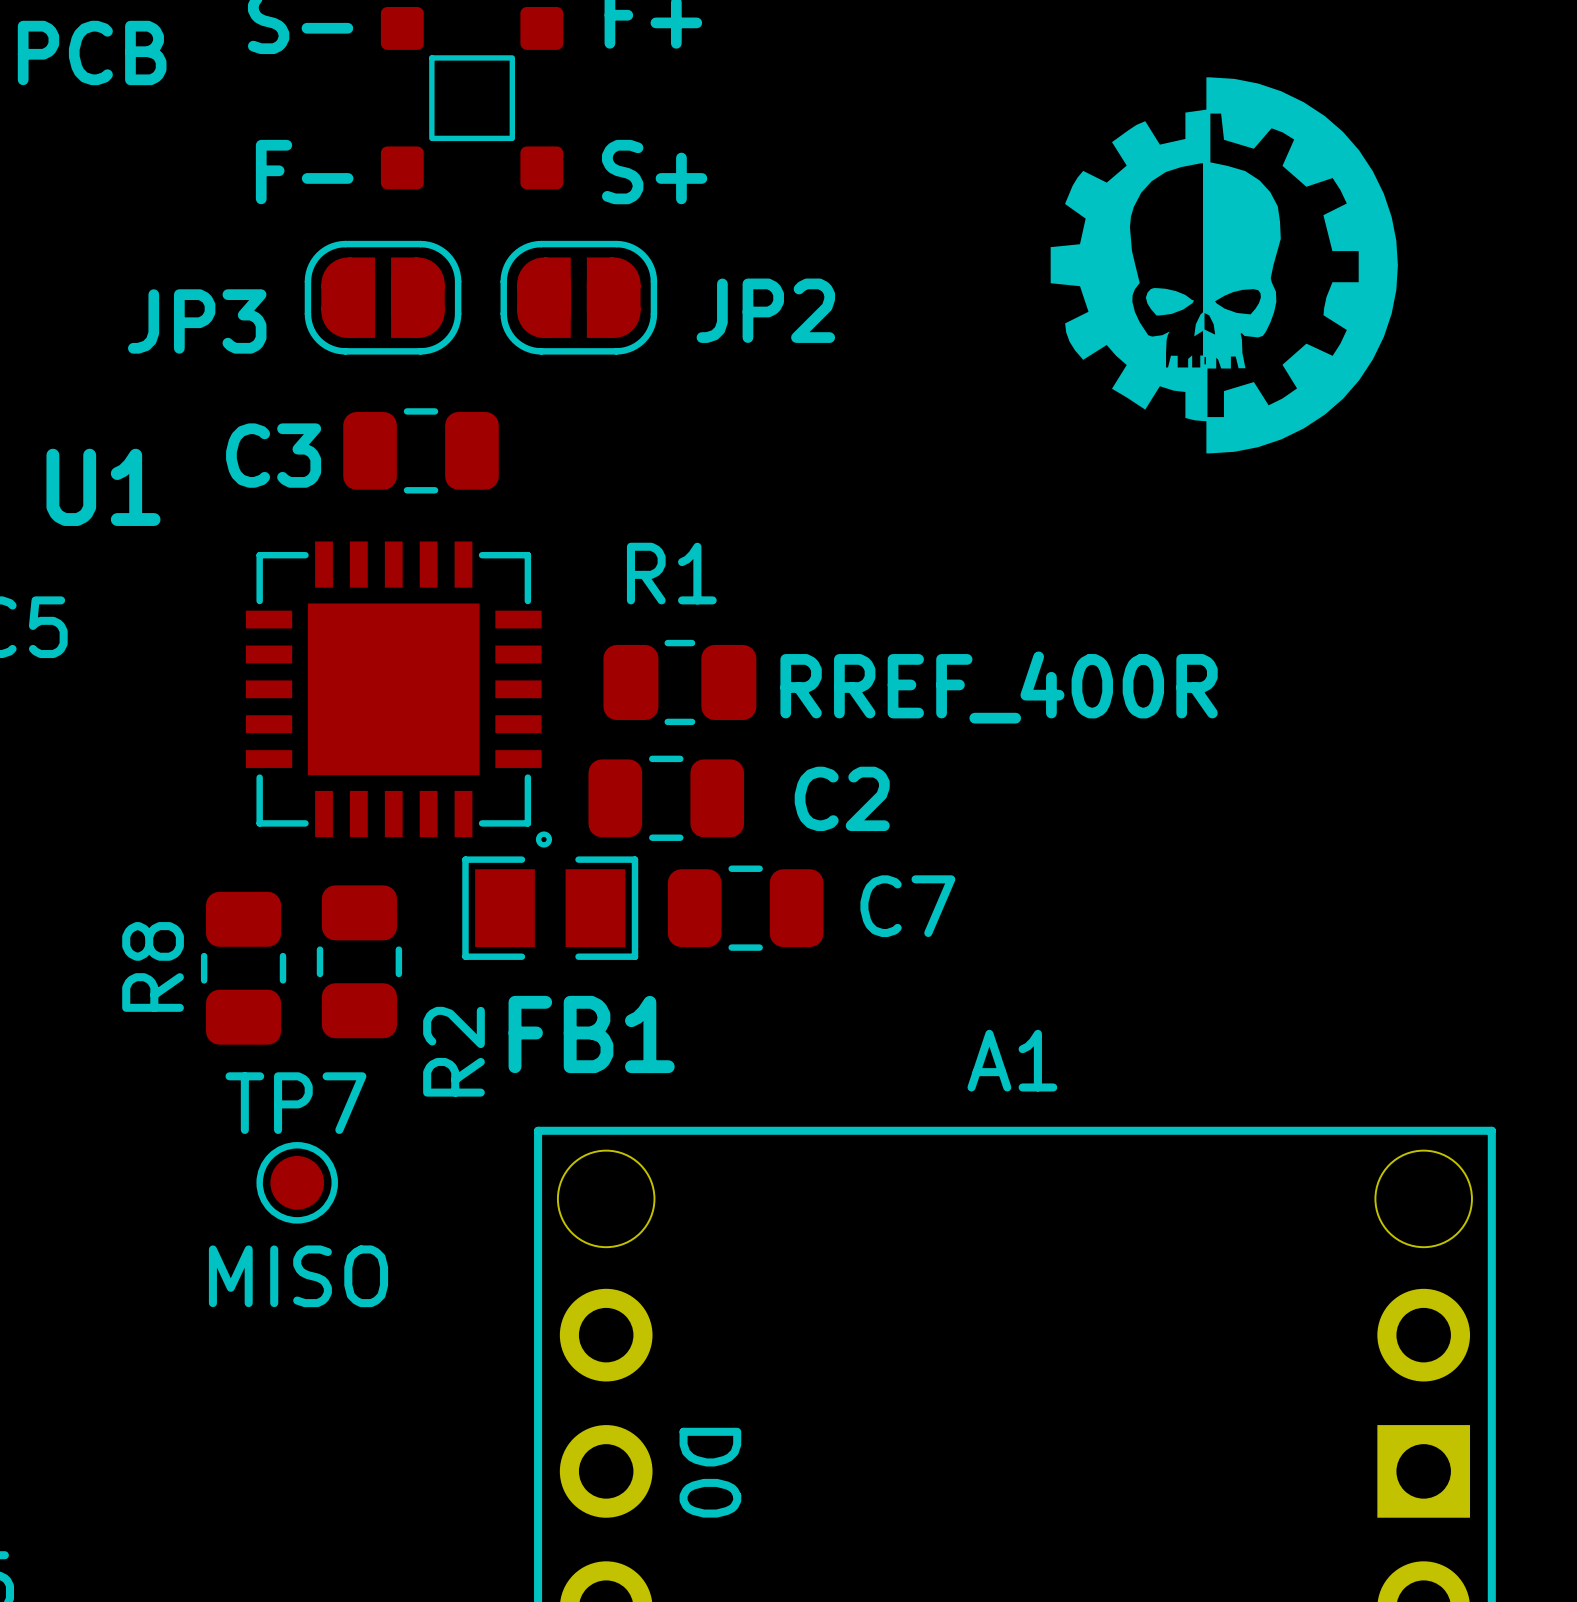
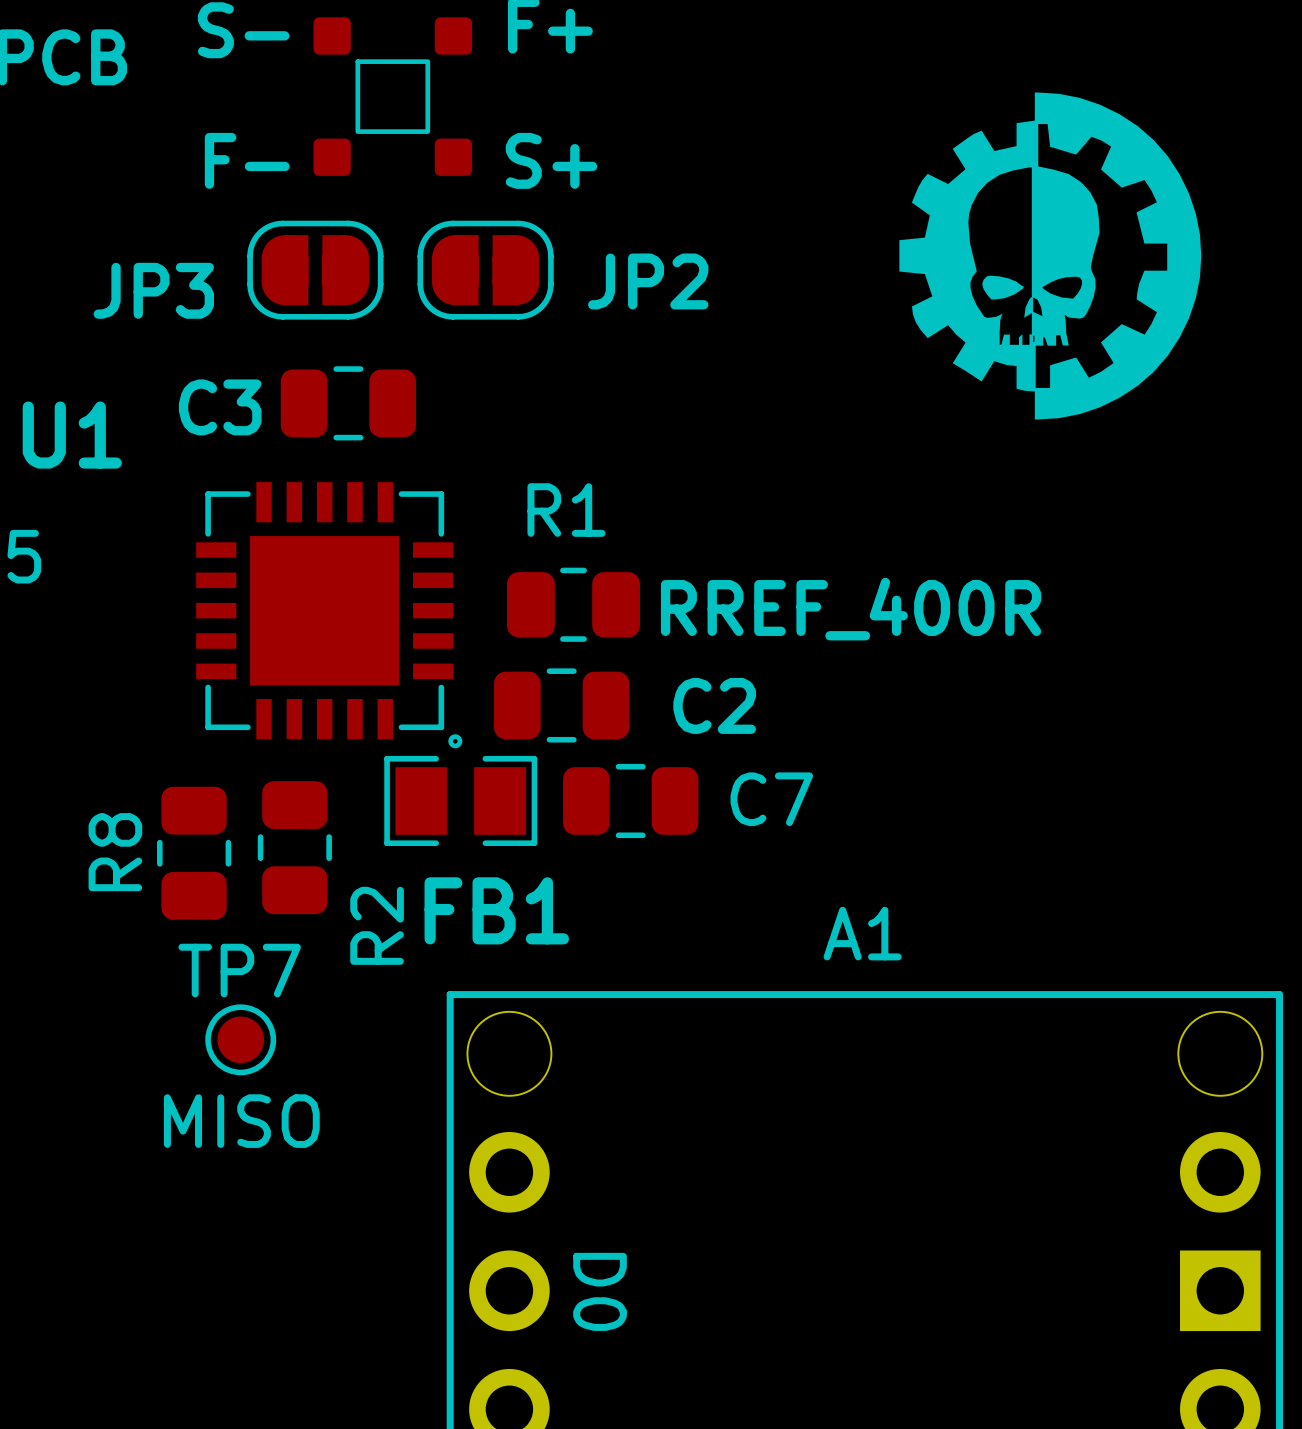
drawing position: (1224, 265) -> (1050, 255)
drawing position: (1169, 301) -> (1003, 287)

